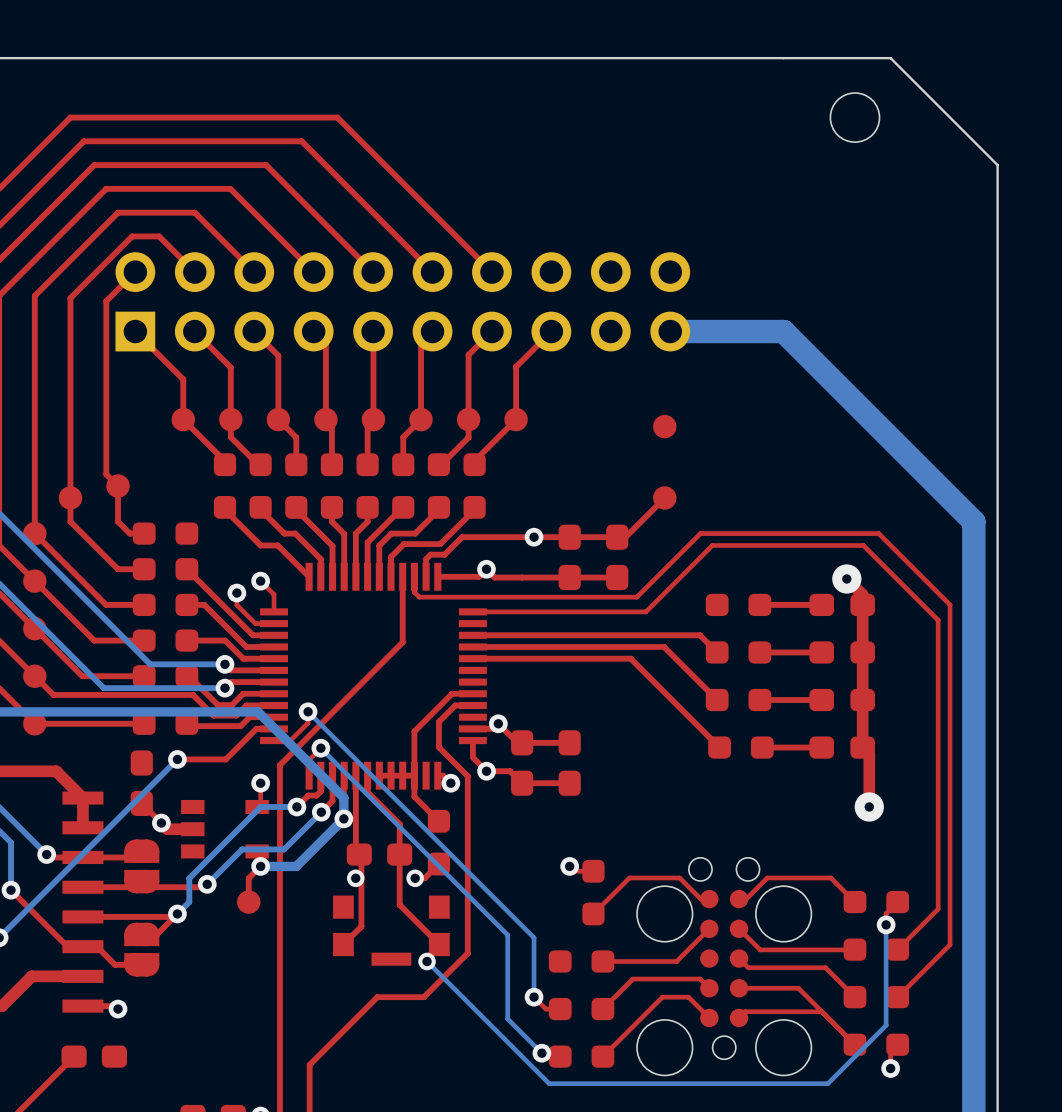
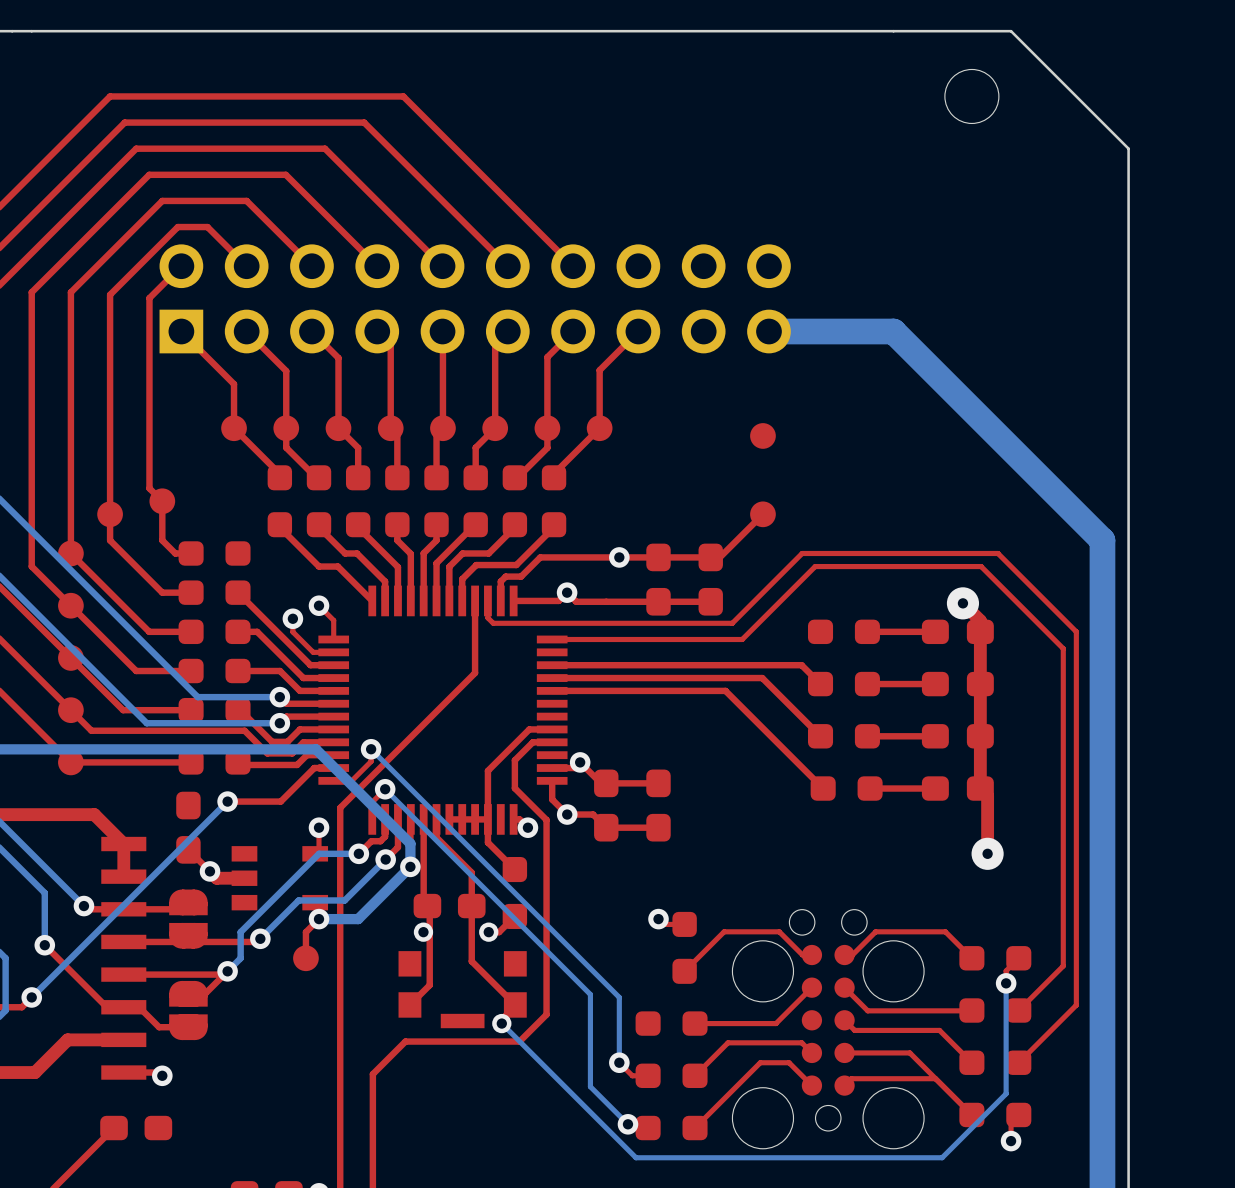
top track: (443, 977) (423, 997) (377, 997) (309, 1064) -> (519, 1041) (405, 1041) (372, 1074) (372, 1137)

